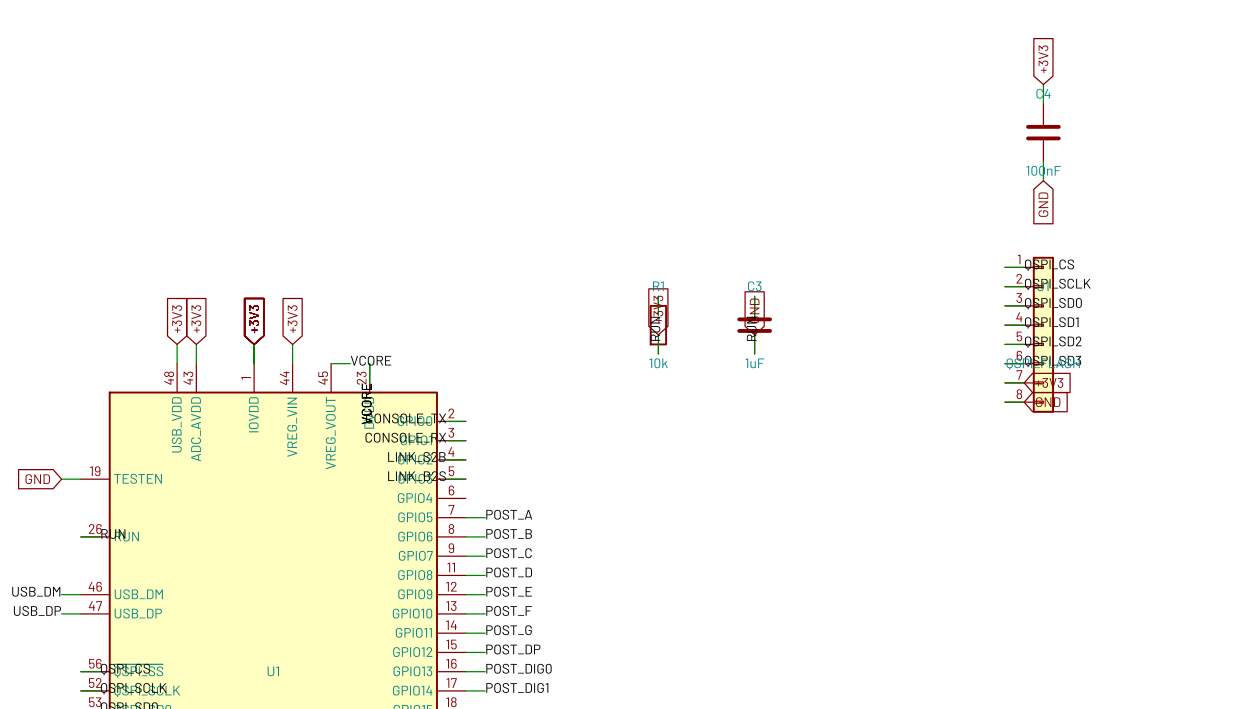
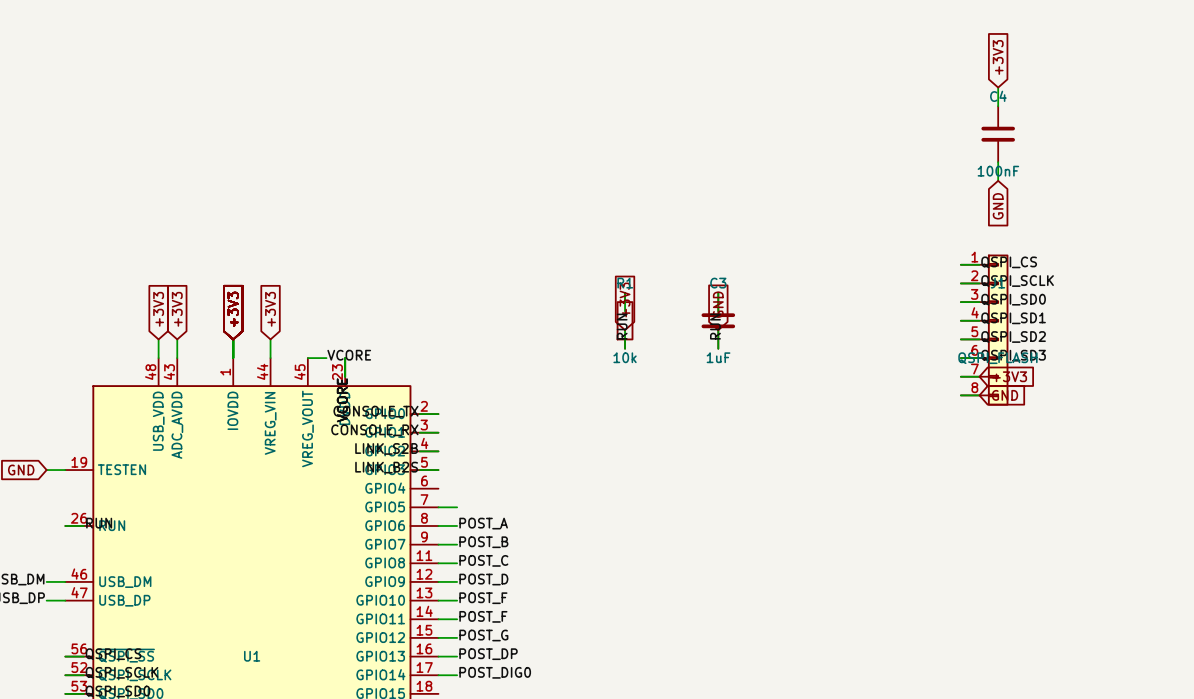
label: POST_A (509, 514) -> none
label: POST_B (509, 533) -> POST_A (483, 523)
label: POST_C (509, 553) -> POST_B (483, 542)
label: POST_D (509, 572) -> POST_C (483, 560)
label: POST_E (509, 591) -> POST_D (483, 579)
label: POST_G (509, 630) -> POST_F (483, 616)
label: POST_DP (513, 649) -> POST_G (483, 635)
label: POST_DIG0 (518, 668) -> POST_DP (488, 654)
label: POST_DIG1 (517, 687) -> POST_DIG0 (495, 672)

